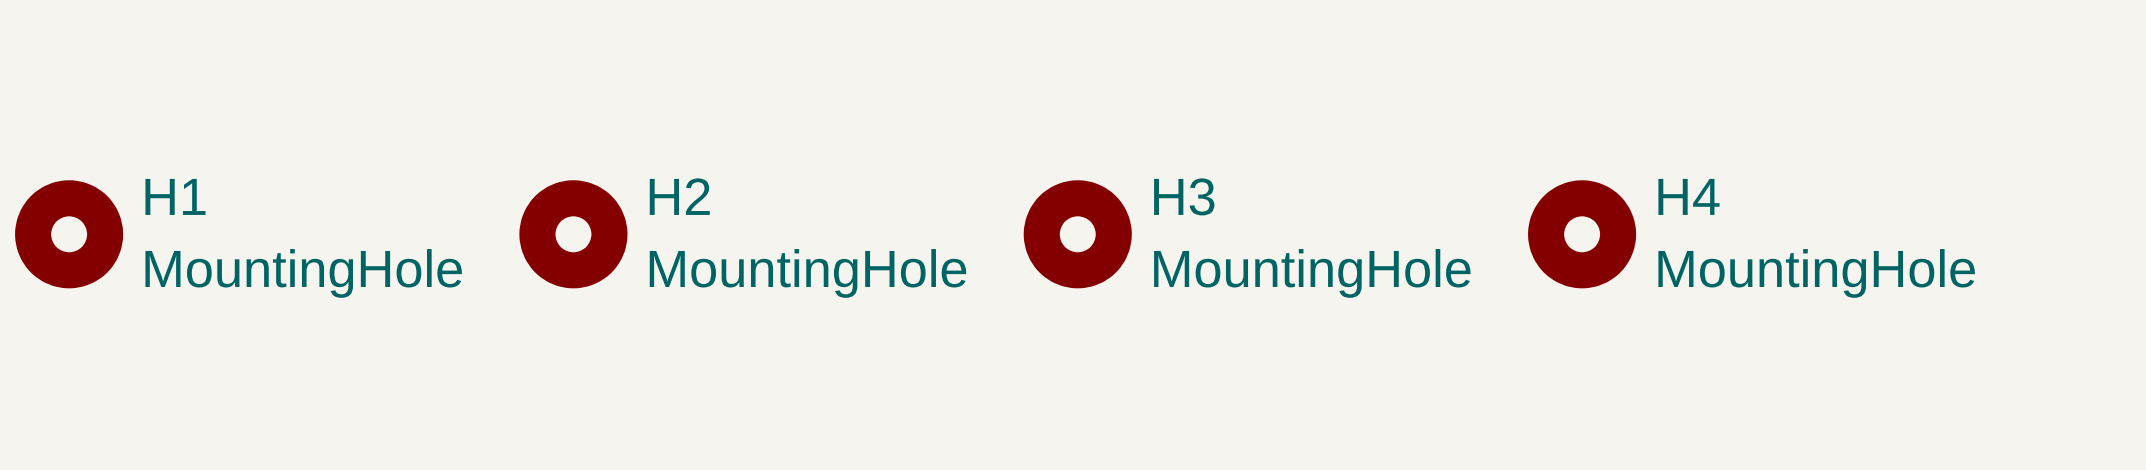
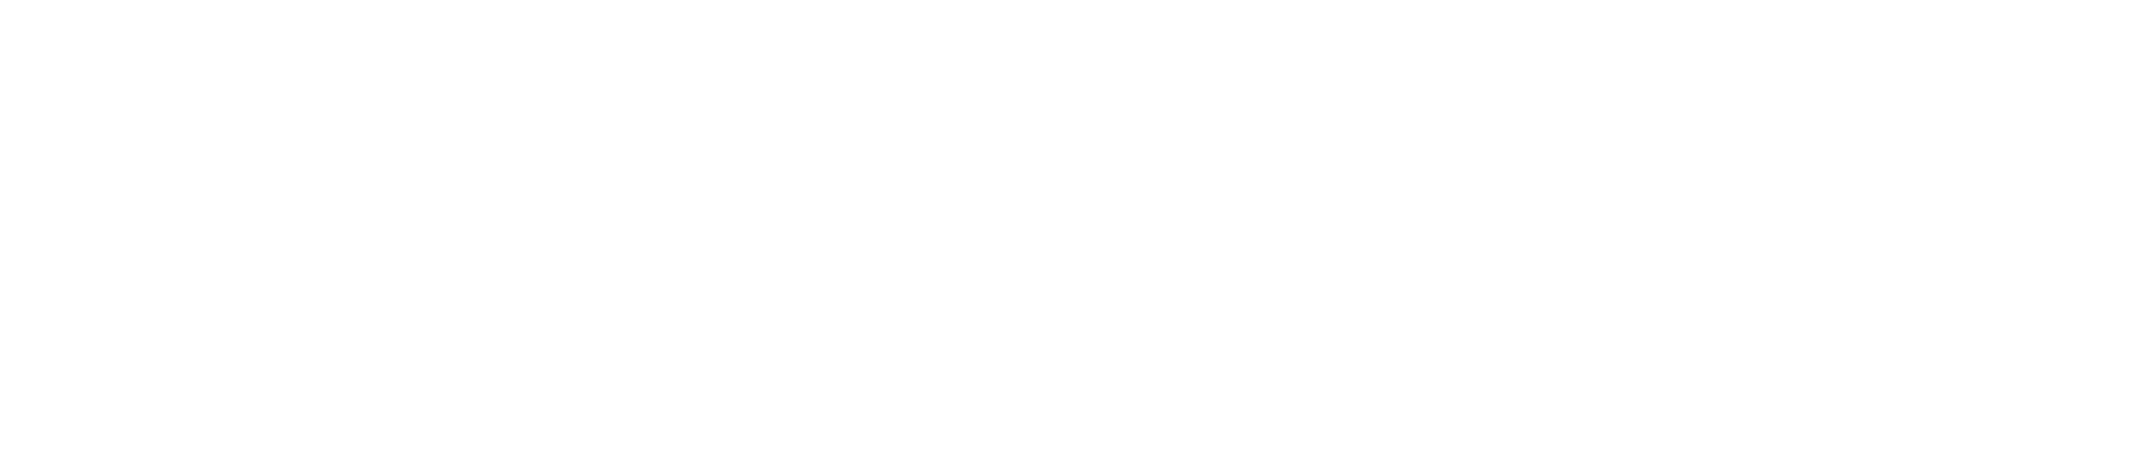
H1: MountingHole (69, 234) -> none
H2: MountingHole (573, 234) -> none
H3: MountingHole (1077, 234) -> none
H4: MountingHole (1582, 234) -> none

